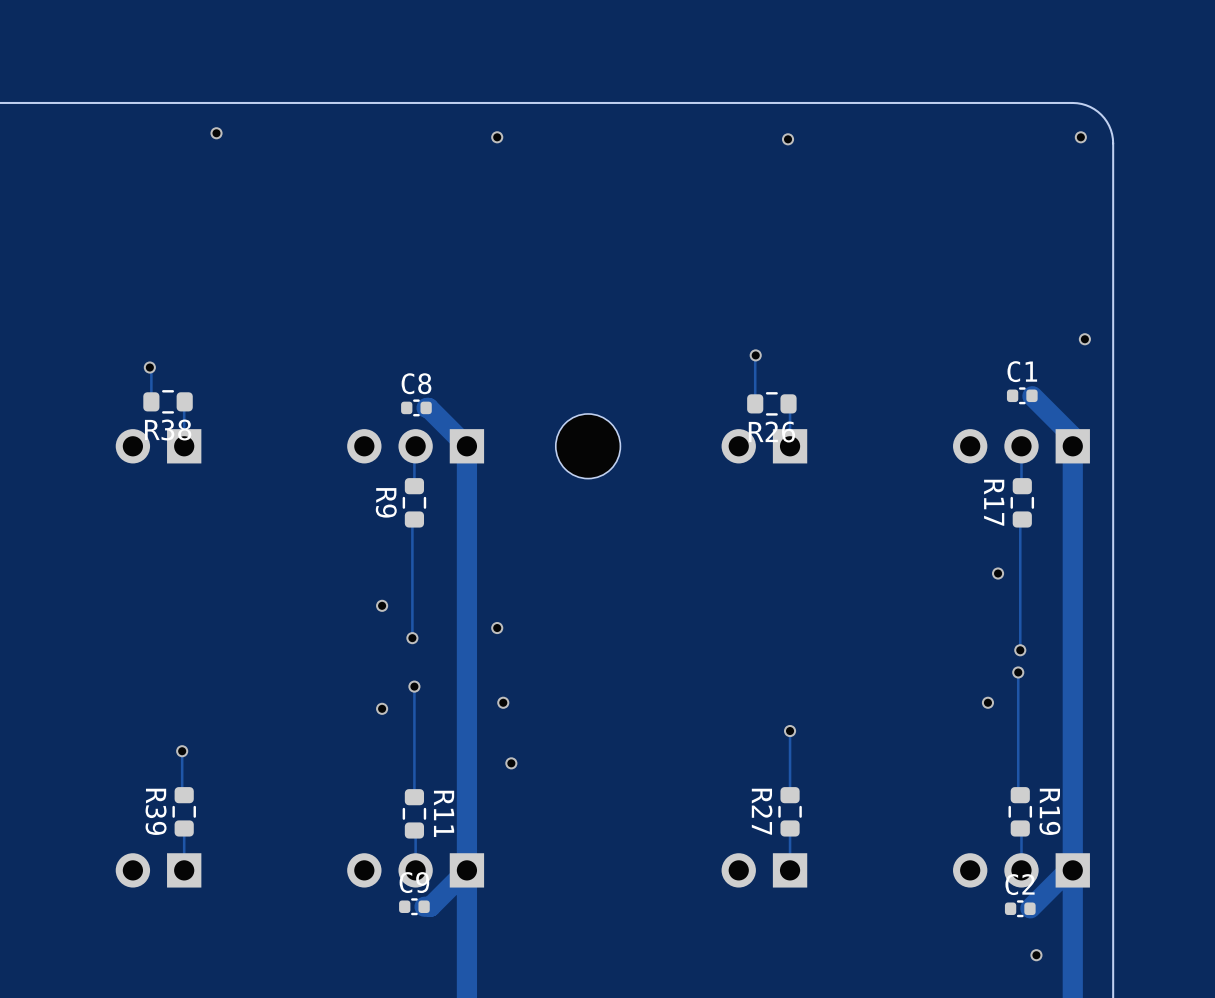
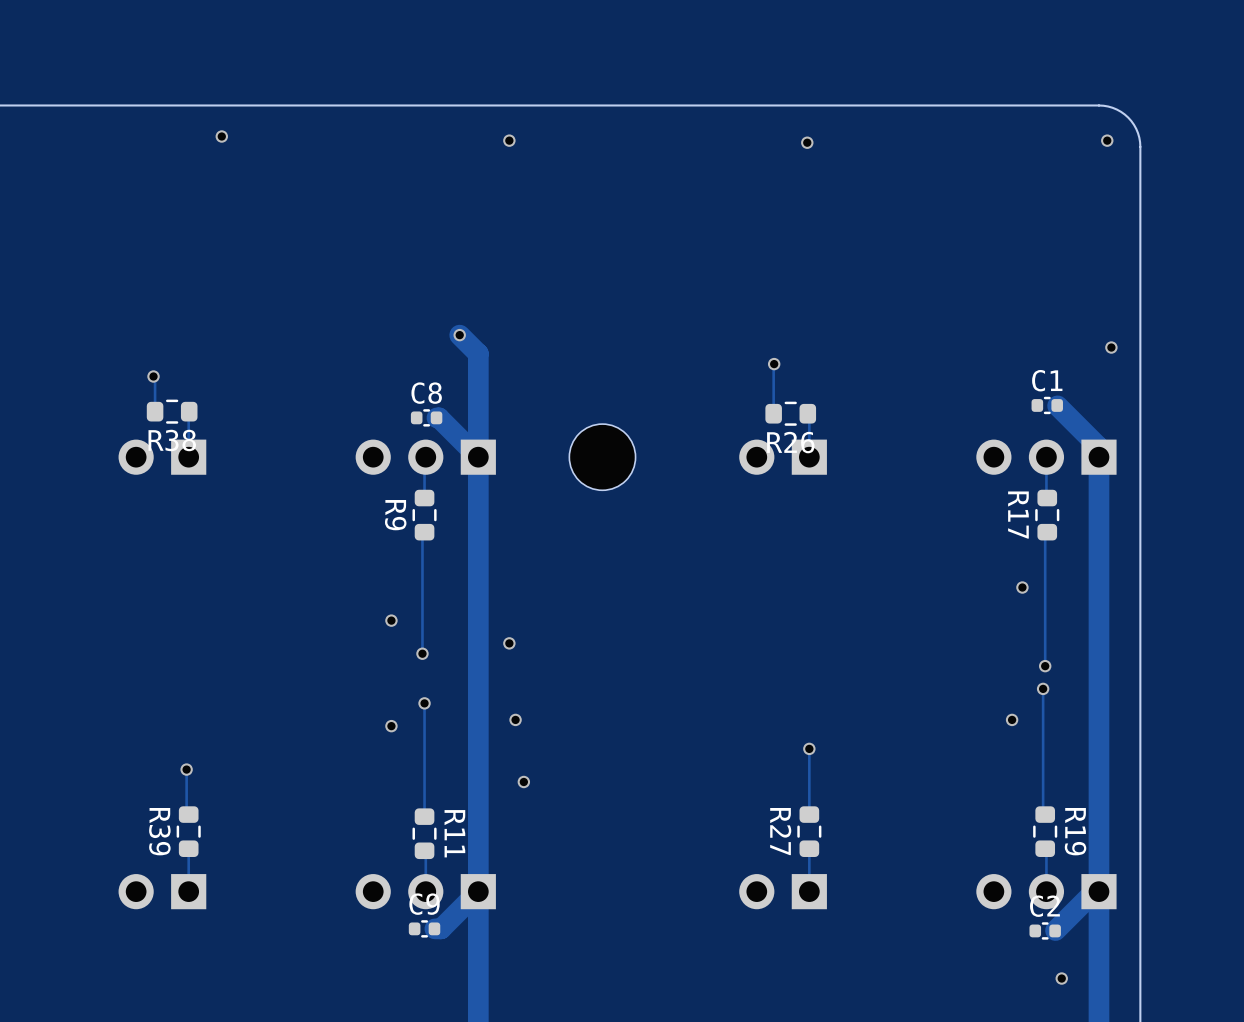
track: none -> (459, 335) (478, 353) (478, 457)
via: none -> (459, 335)

